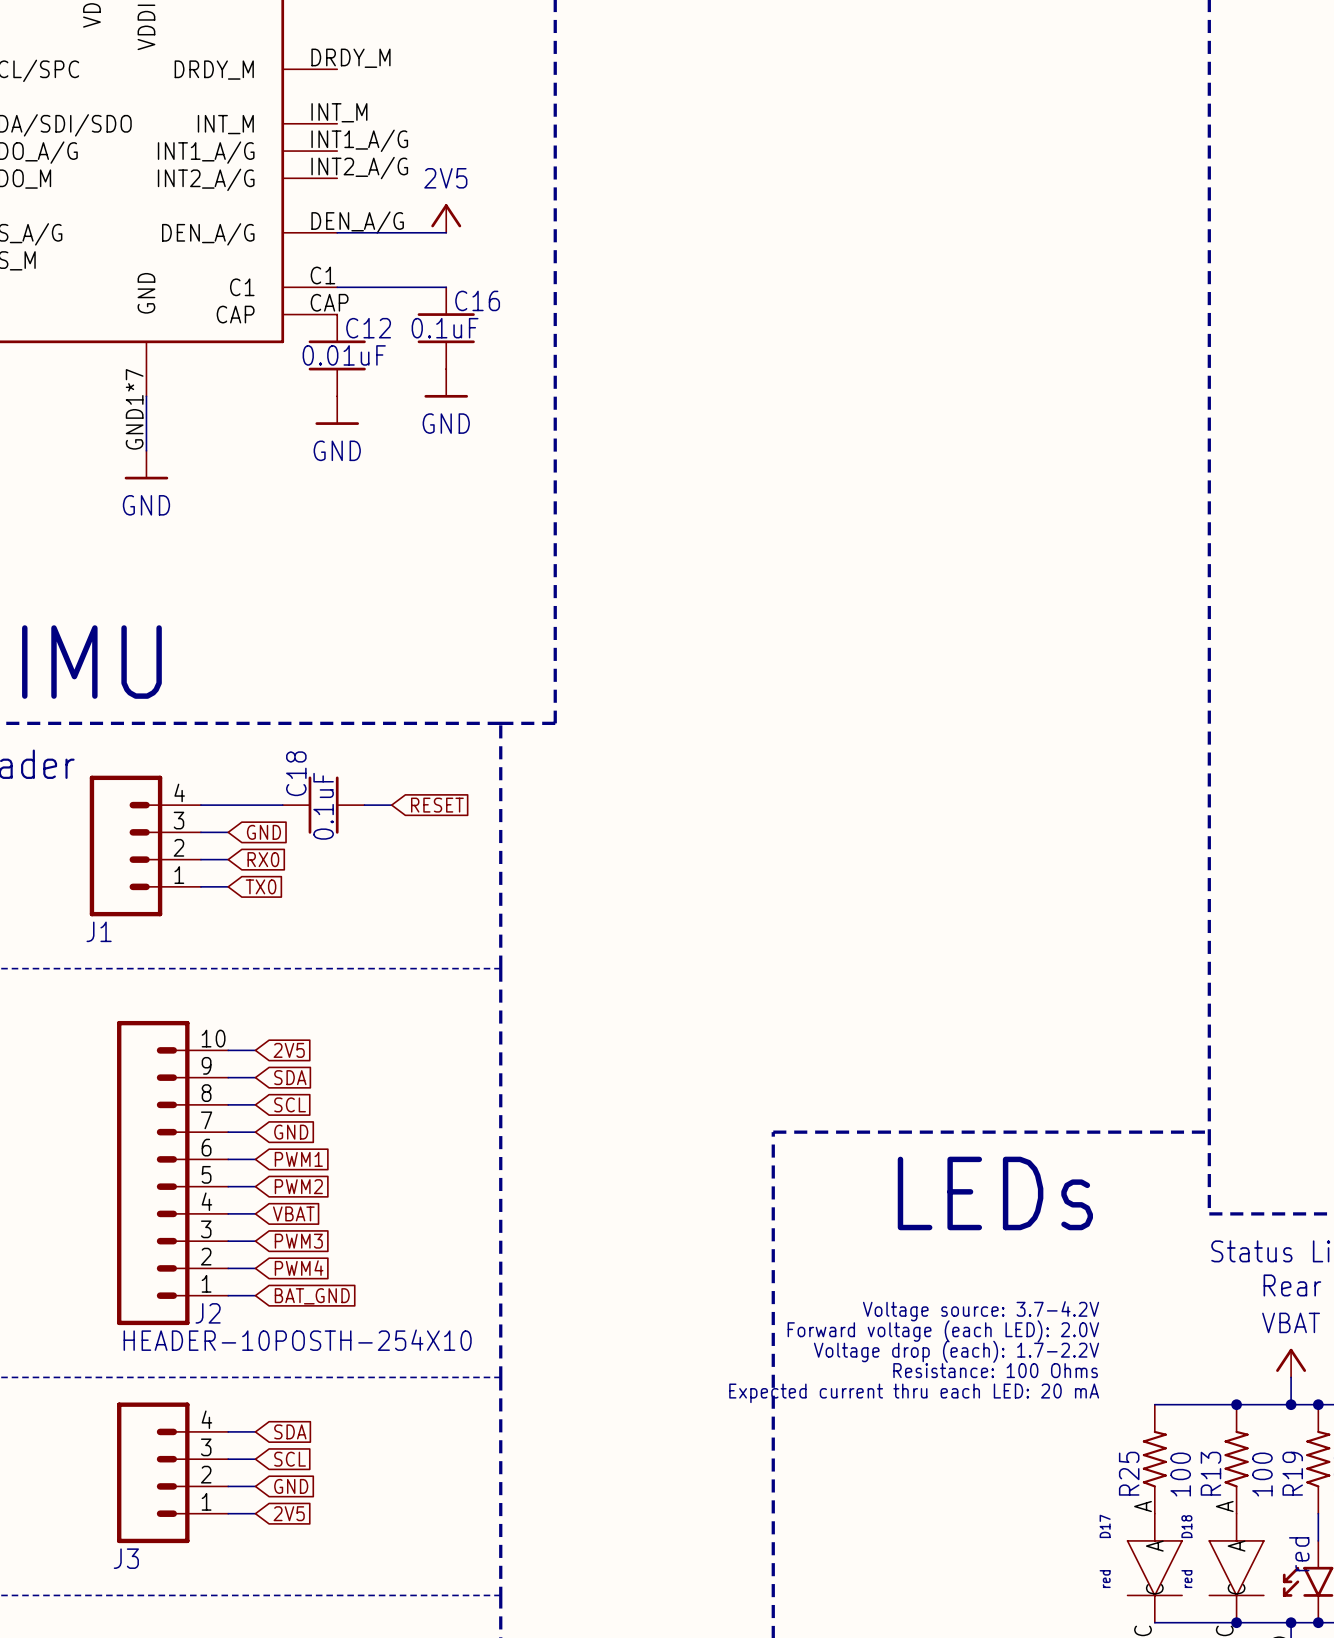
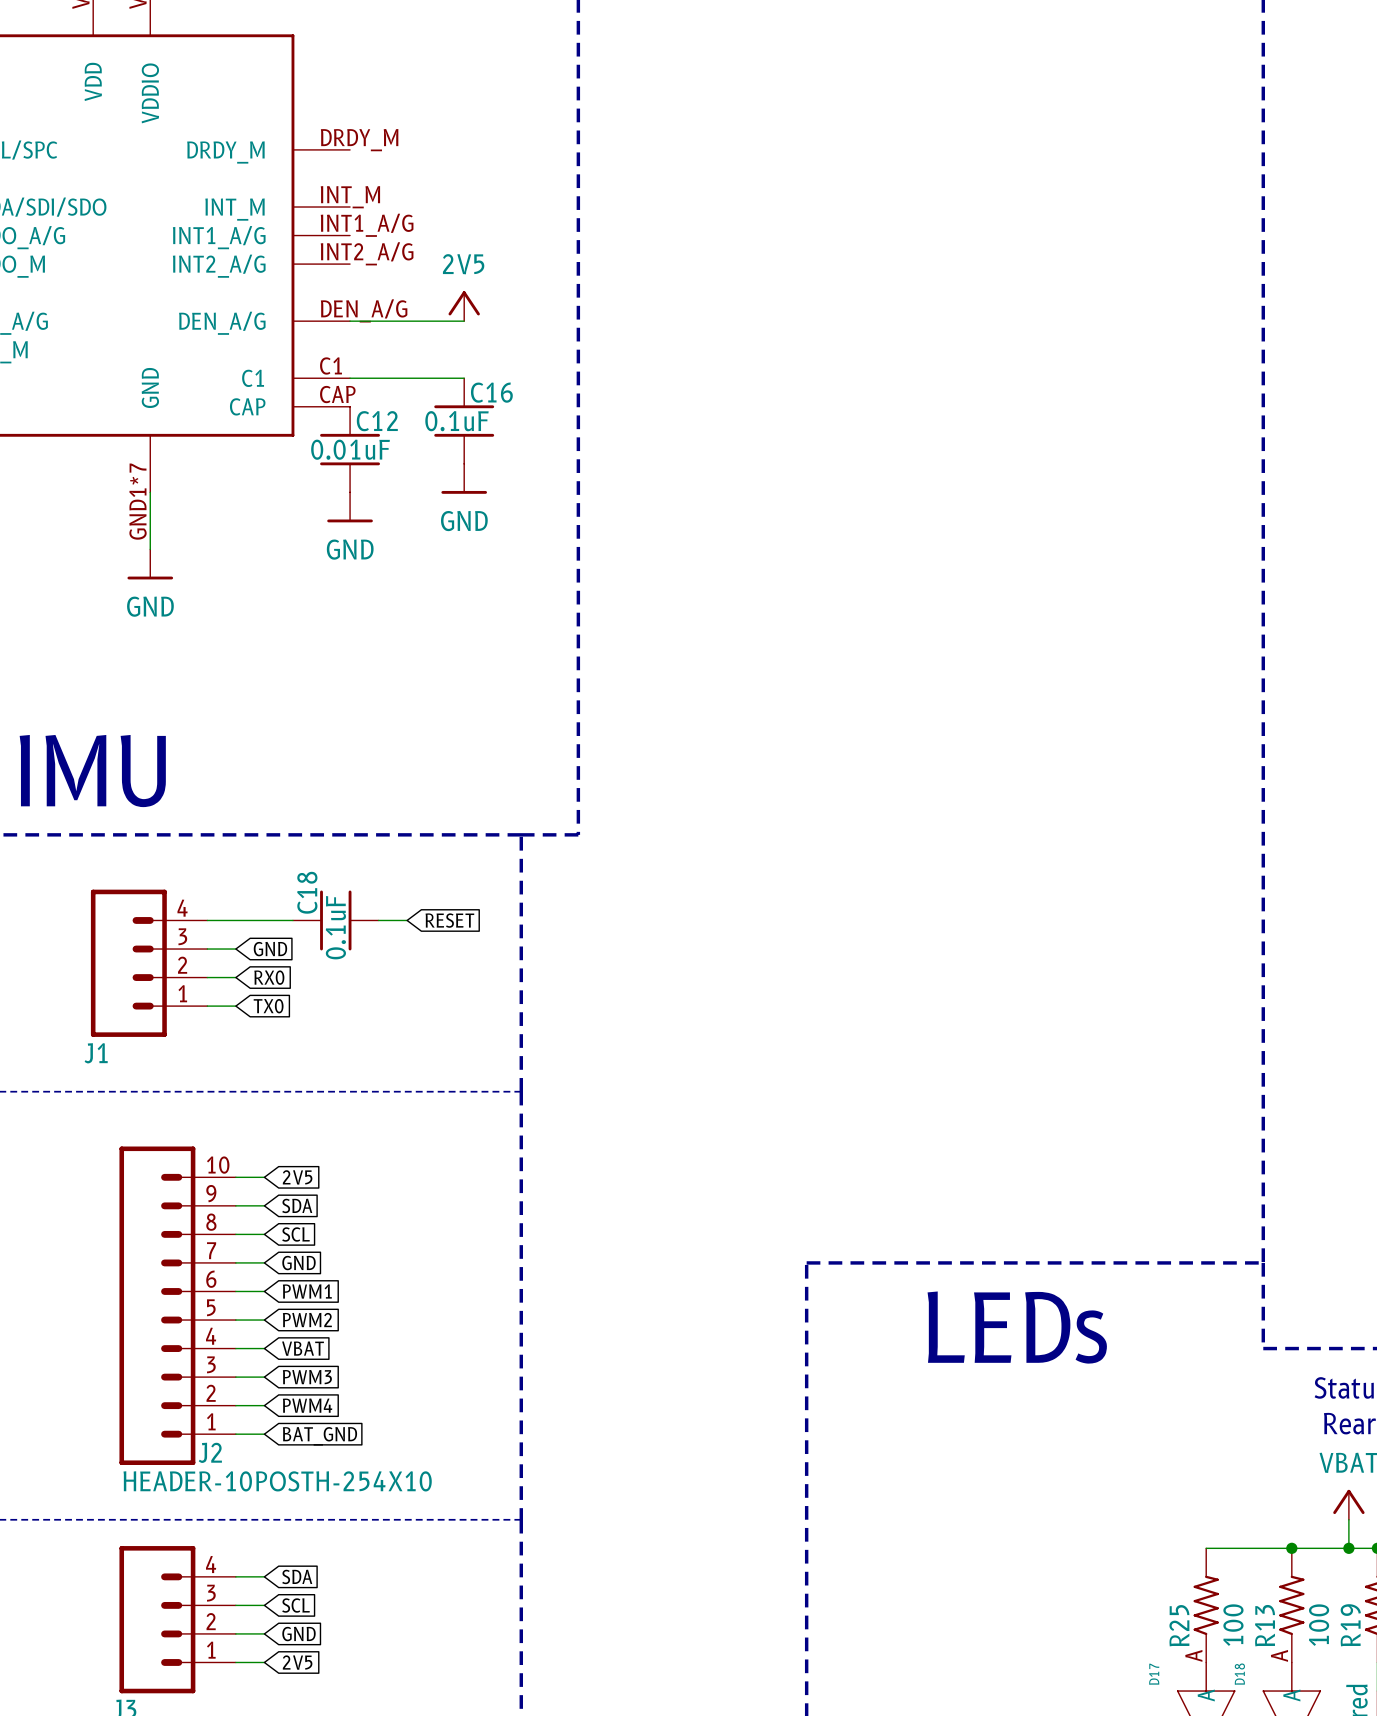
text: Voltage source: 3.7-4.2V (981, 1311) -> none
text: Forward voltage (each LED): 2.0V (943, 1331) -> none
text: Voltage drop (each): 1.7-2.2V (956, 1351) -> none
text: Resistance: 100 Ohms (995, 1370) -> none
text: Expected current thru each LED: 20 mA (914, 1393) -> none

